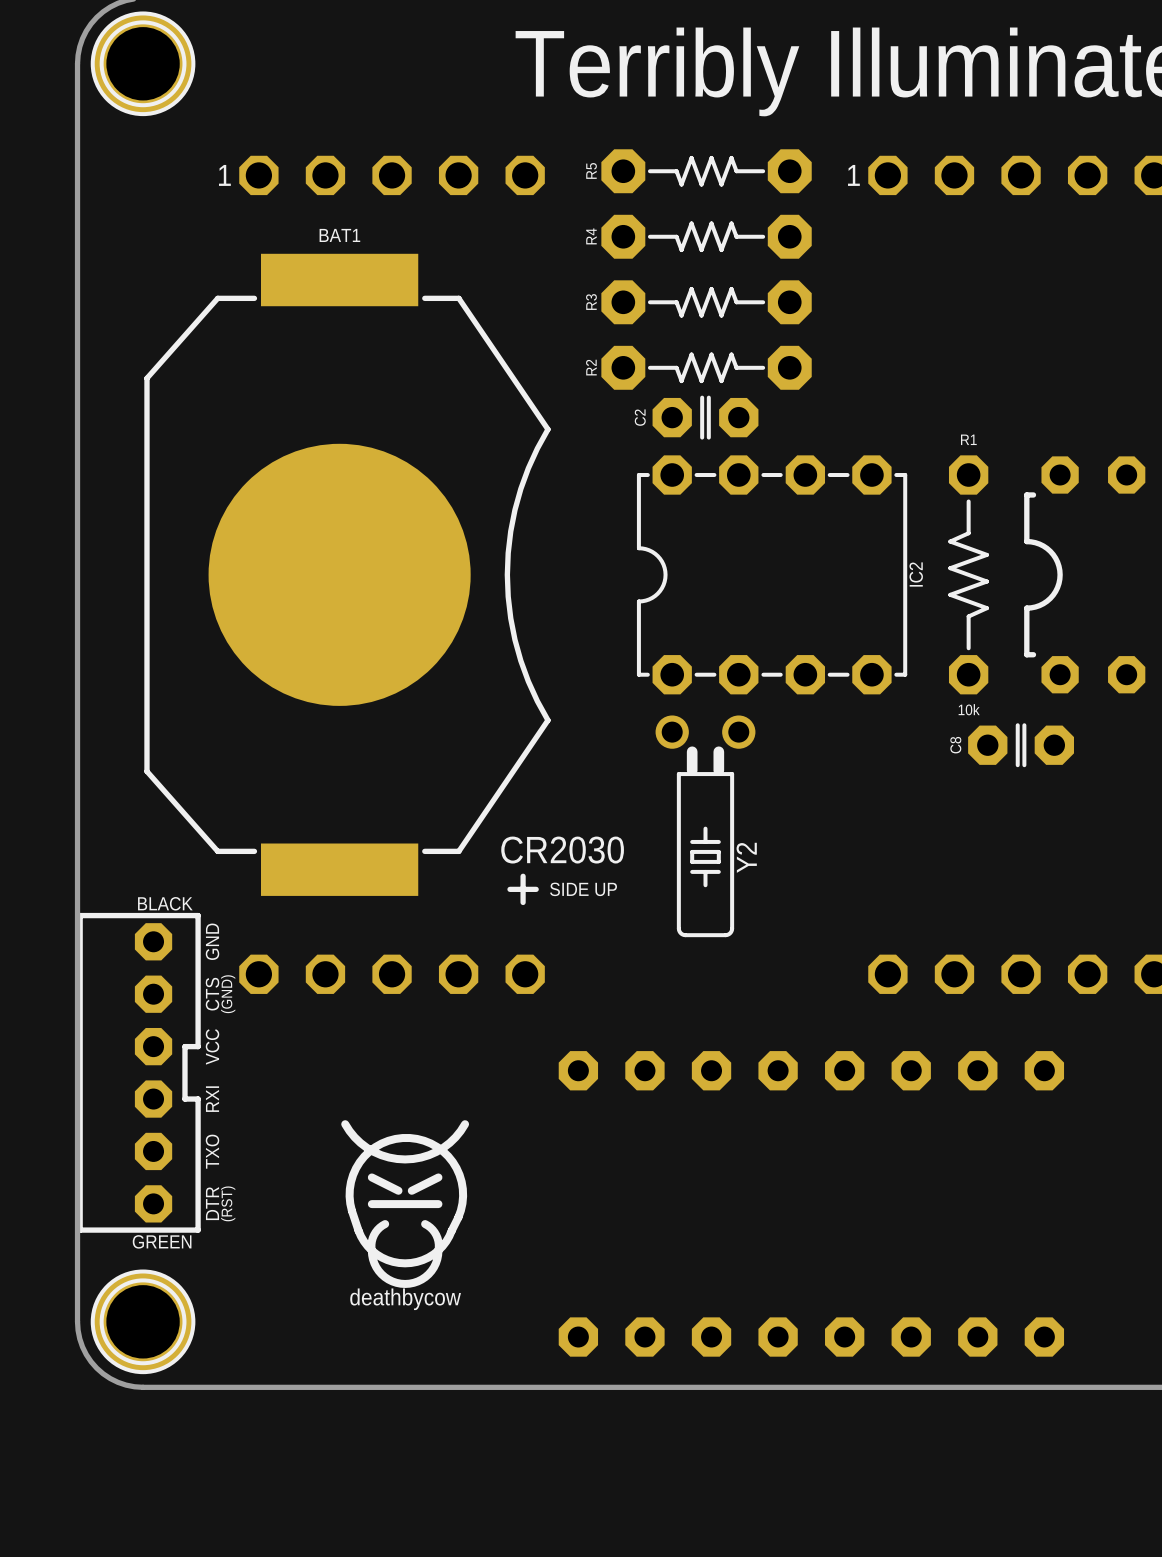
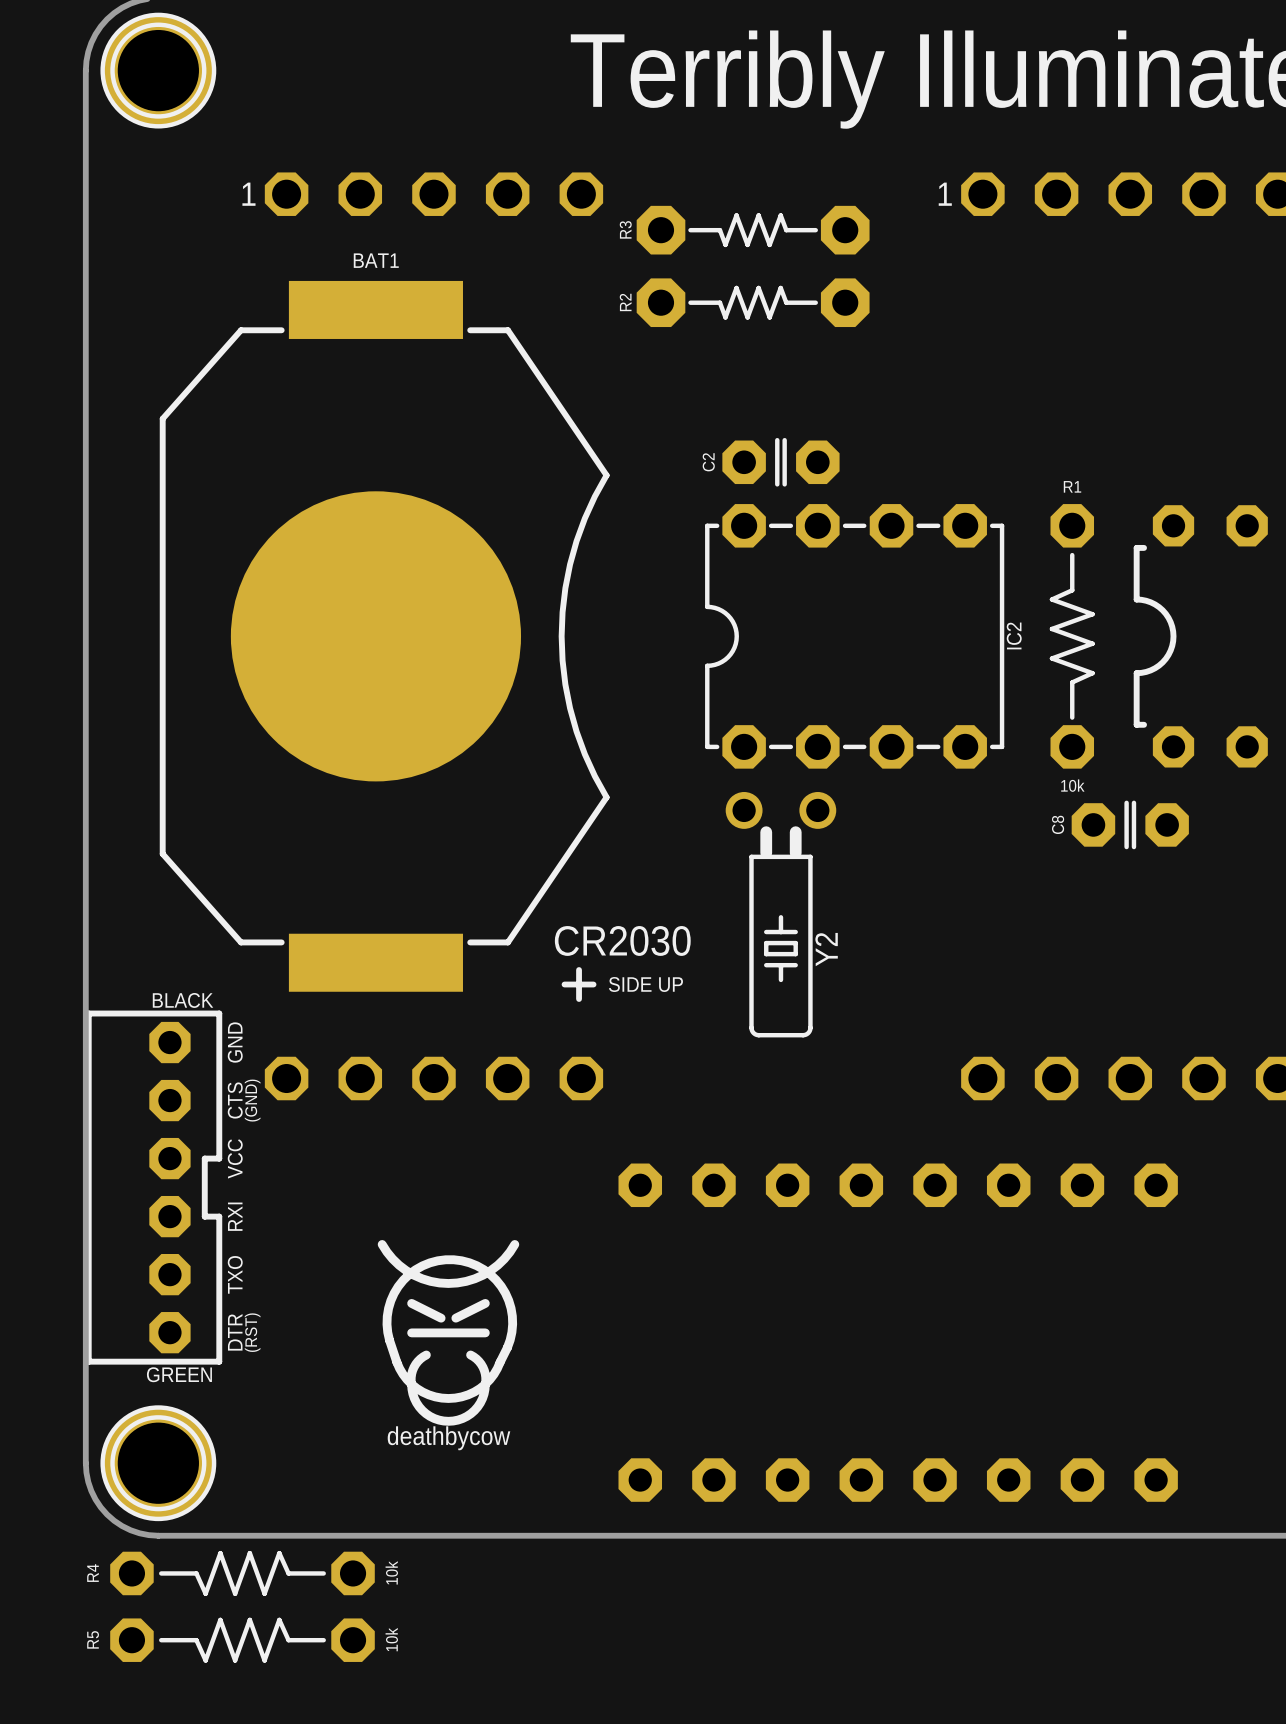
R5 footprint: [601, 149, 812, 194] -> [110, 1617, 375, 1663]
R4 footprint: [601, 214, 812, 259] -> [110, 1550, 375, 1596]
R3 position: (706, 302) -> (753, 230)
R2 position: (706, 367) -> (753, 302)
R4 value: none -> 10k (391, 1572)
R5 value: none -> 10k (391, 1639)

